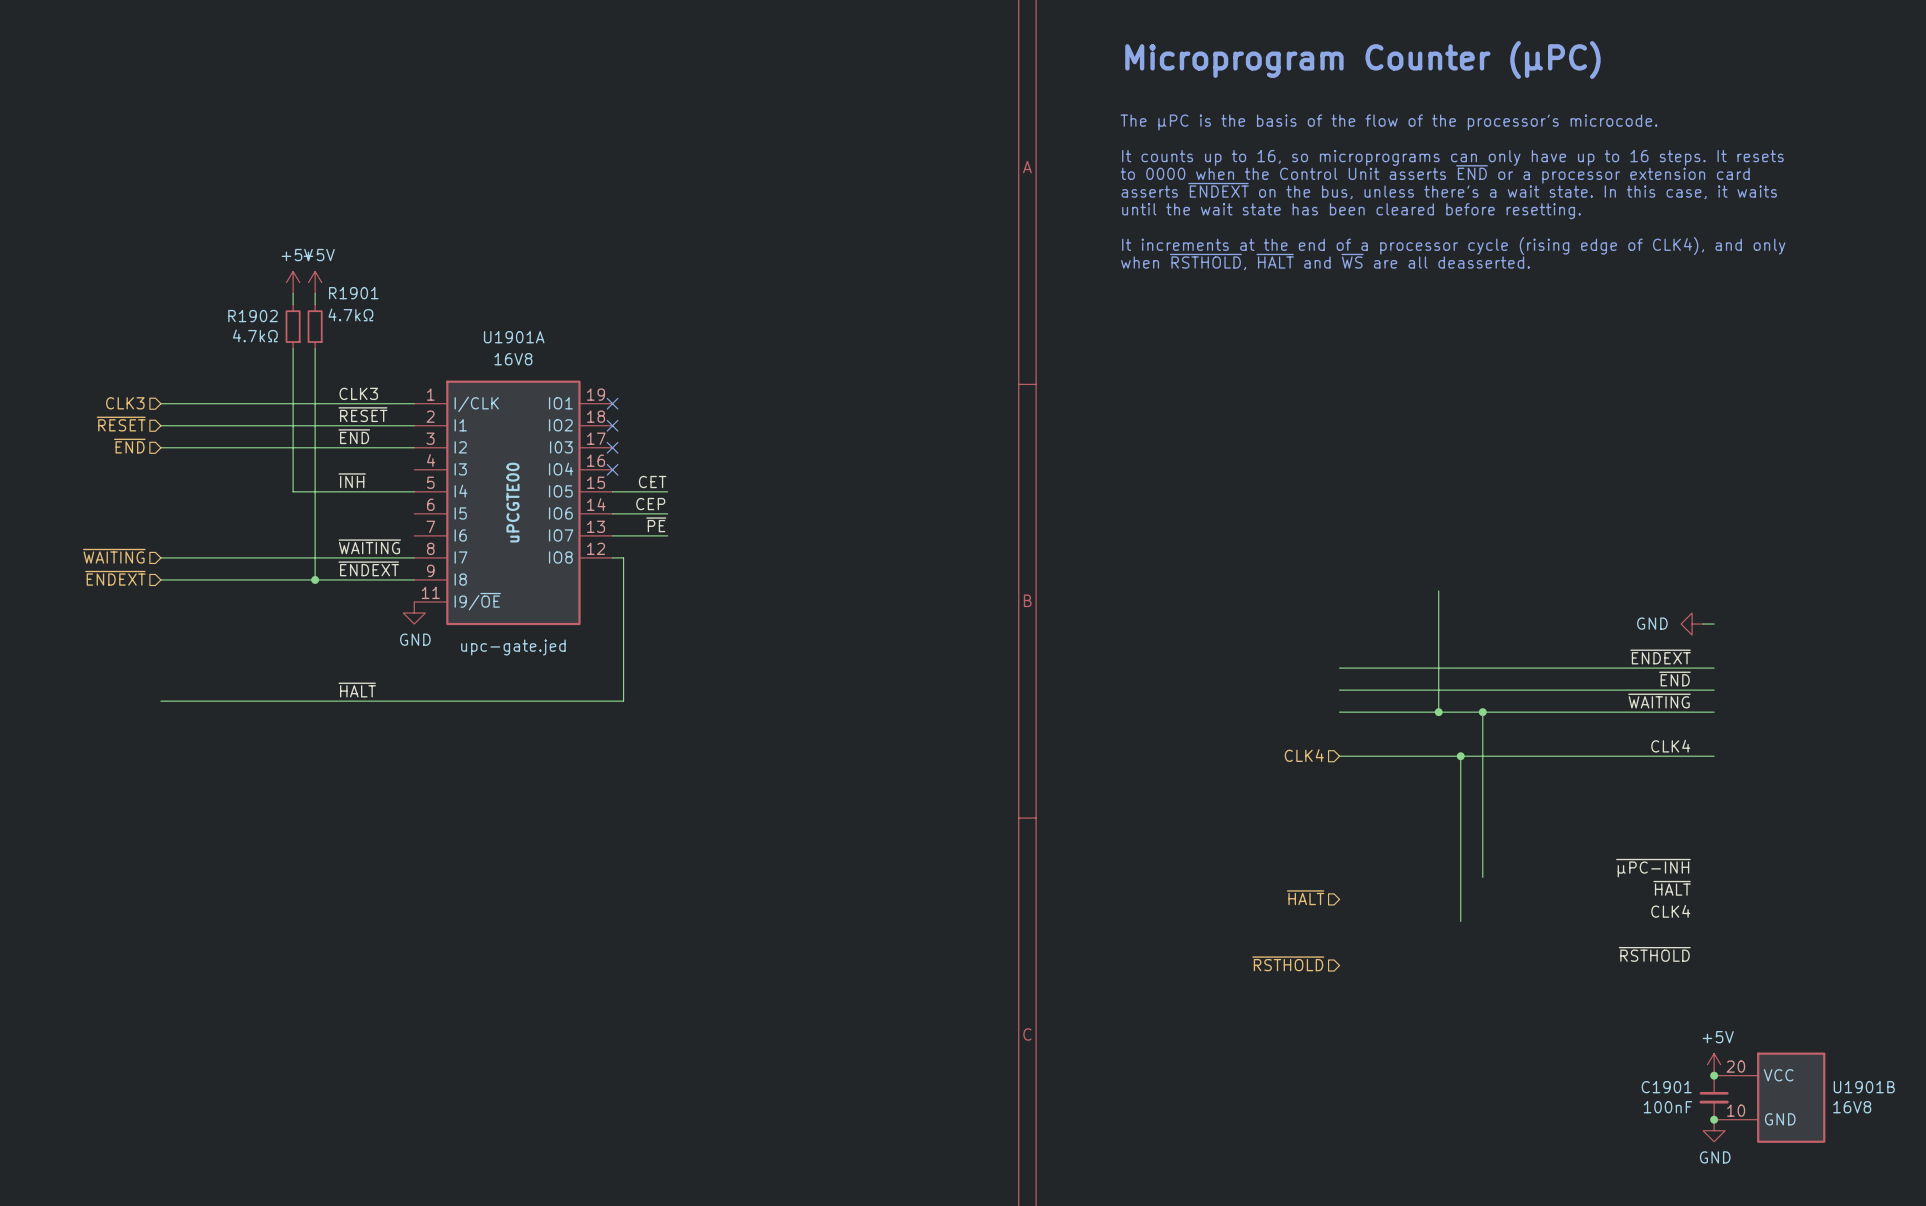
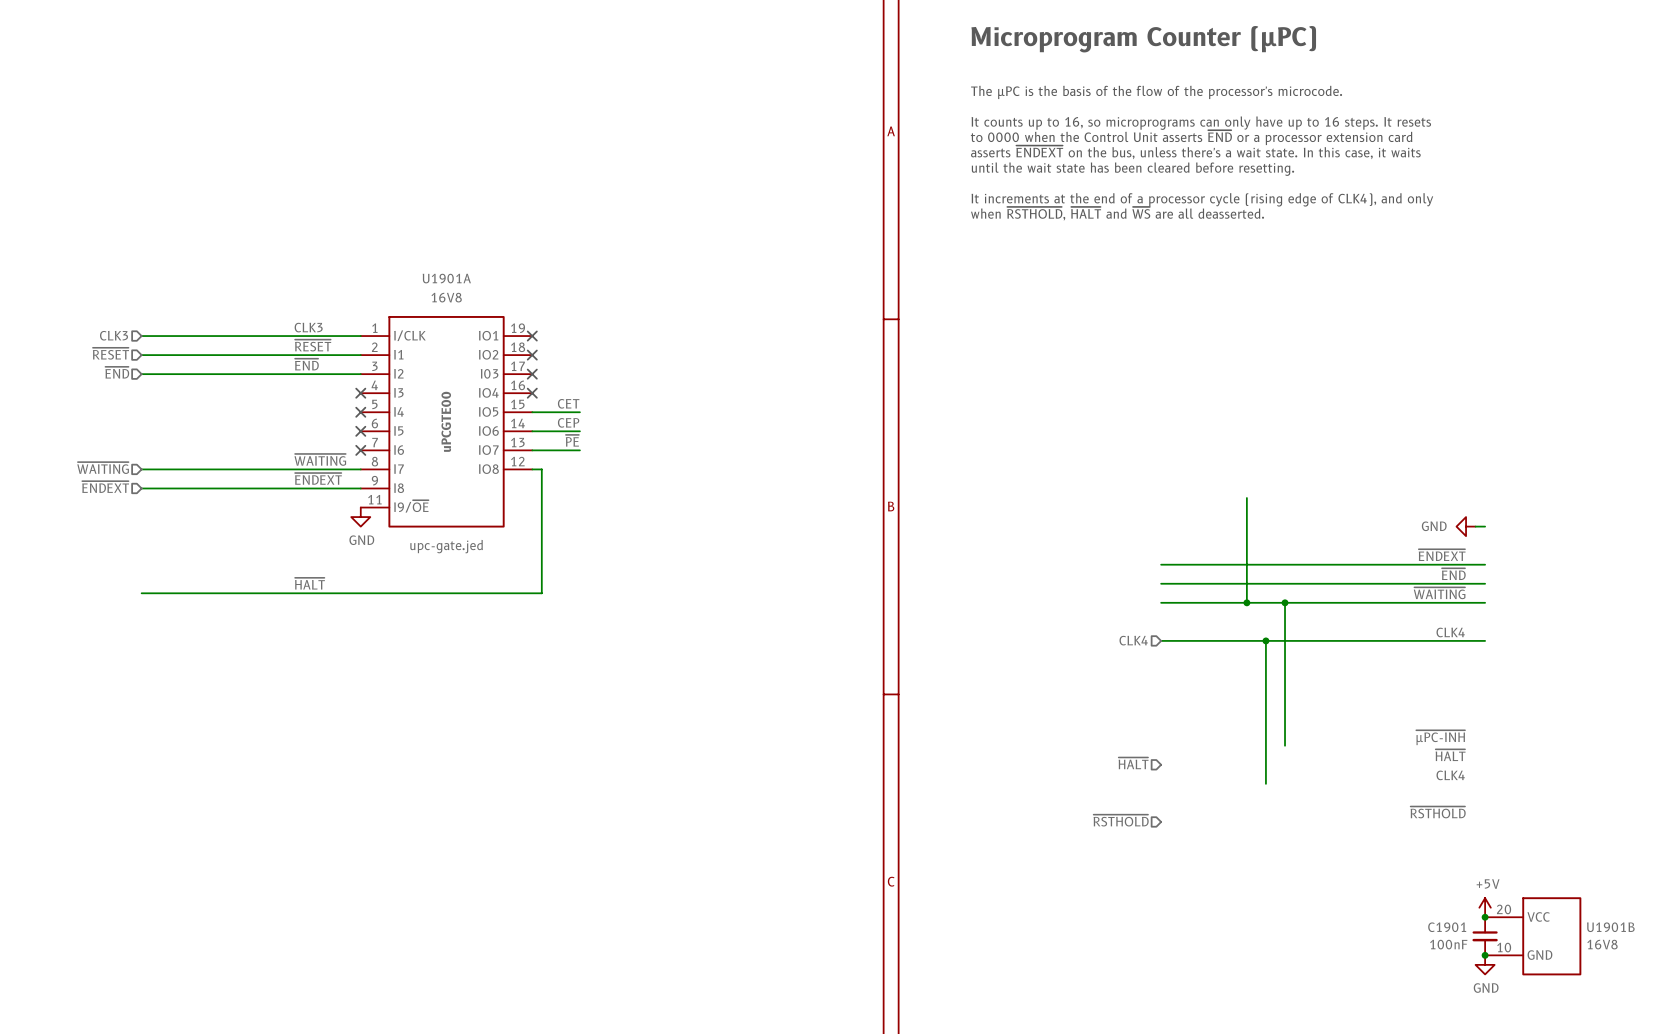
power symbol: +5V (293, 282) -> none
power symbol: +5V (315, 282) -> none
wire: (293, 293) (293, 304) -> none
wire: (315, 293) (315, 304) -> none
R1902: 4.7kΩ (293, 326) -> none
R1901: 4.7kΩ (315, 326) -> none
wire: (293, 348) (293, 491) (414, 491) -> none
wire: (315, 348) (315, 579) -> none
no-connect mark: none -> (360, 393)
label: ~{INH} (352, 480) -> none
no-connect mark: none -> (360, 412)
no-connect mark: none -> (360, 431)
no-connect mark: none -> (360, 450)
junction: (315, 579) -> none

